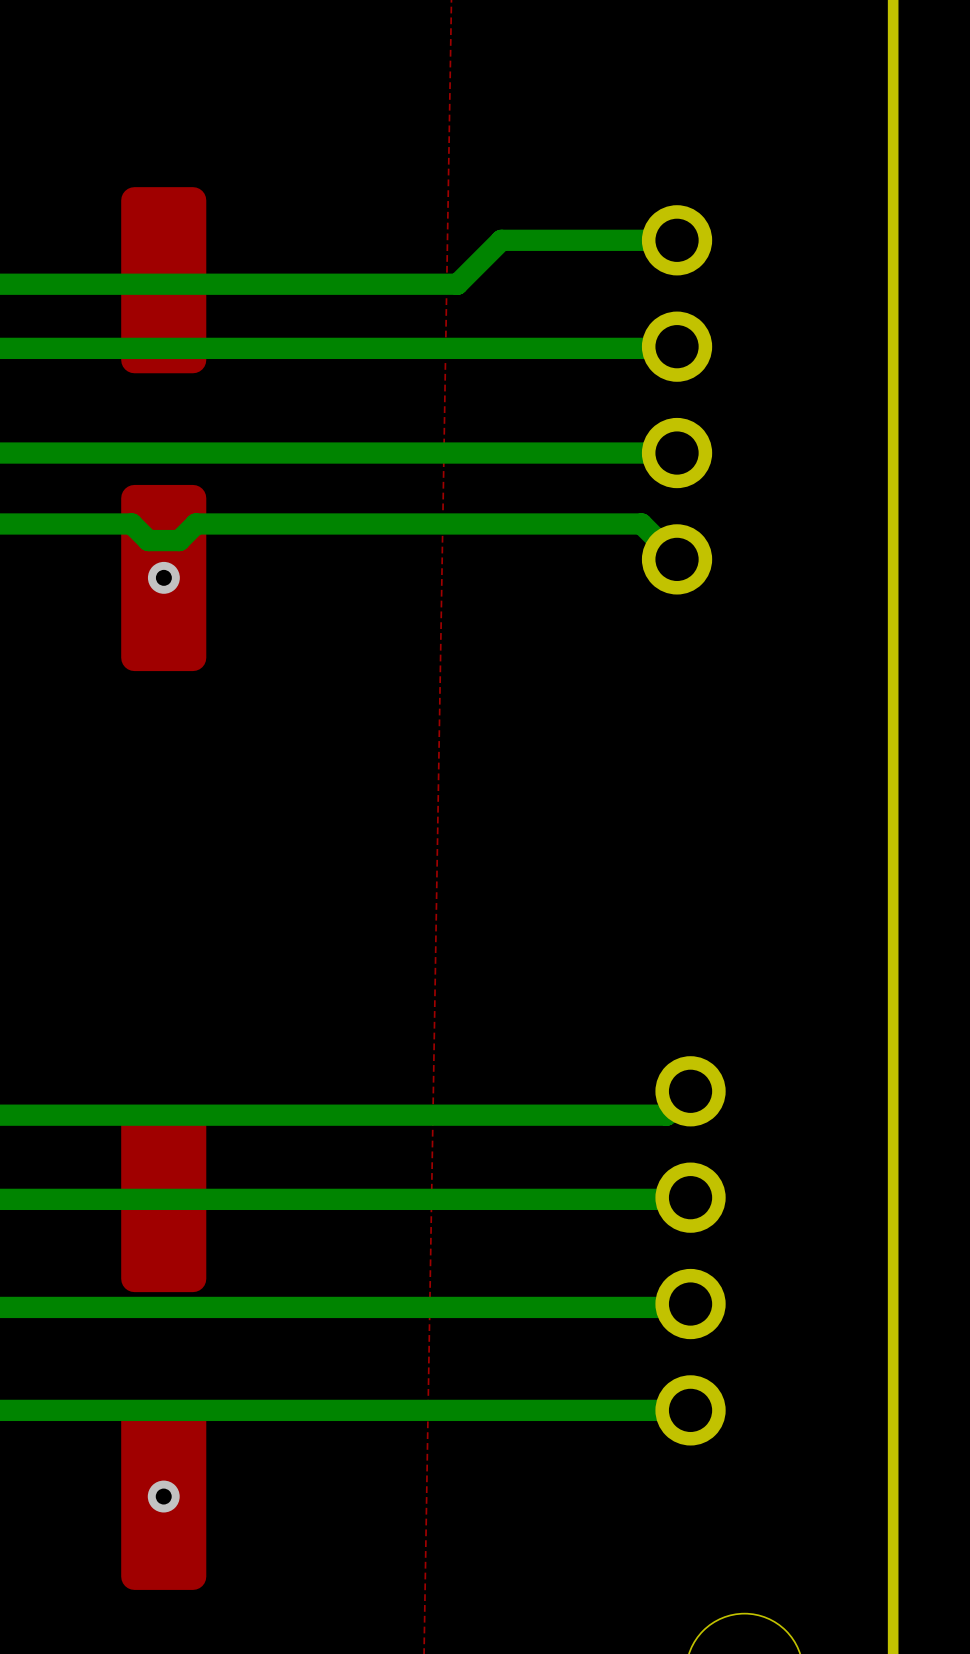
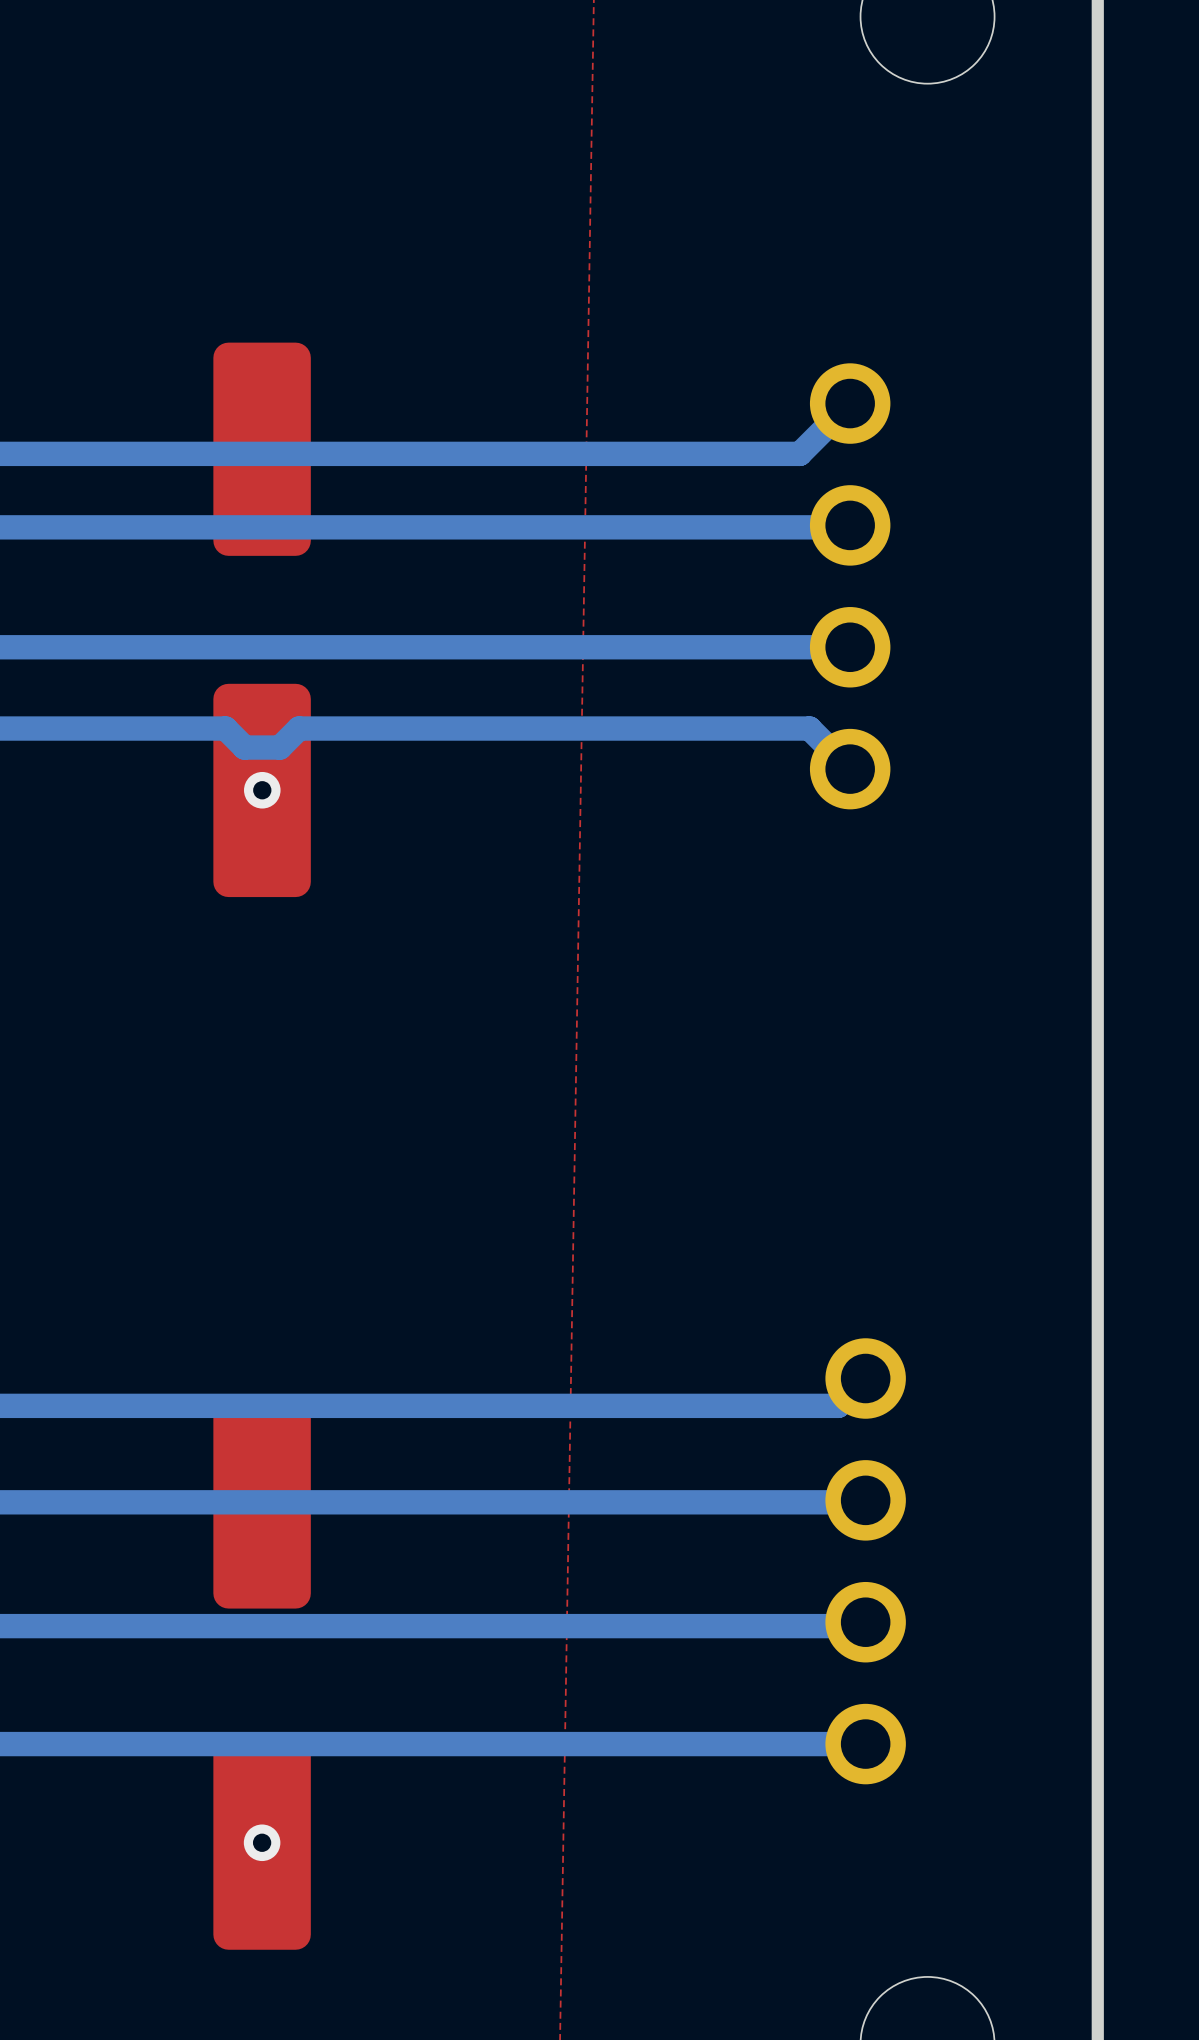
bottom track: (677, 240) (501, 240) (457, 284) -> (850, 403) (799, 453) (598, 453)

